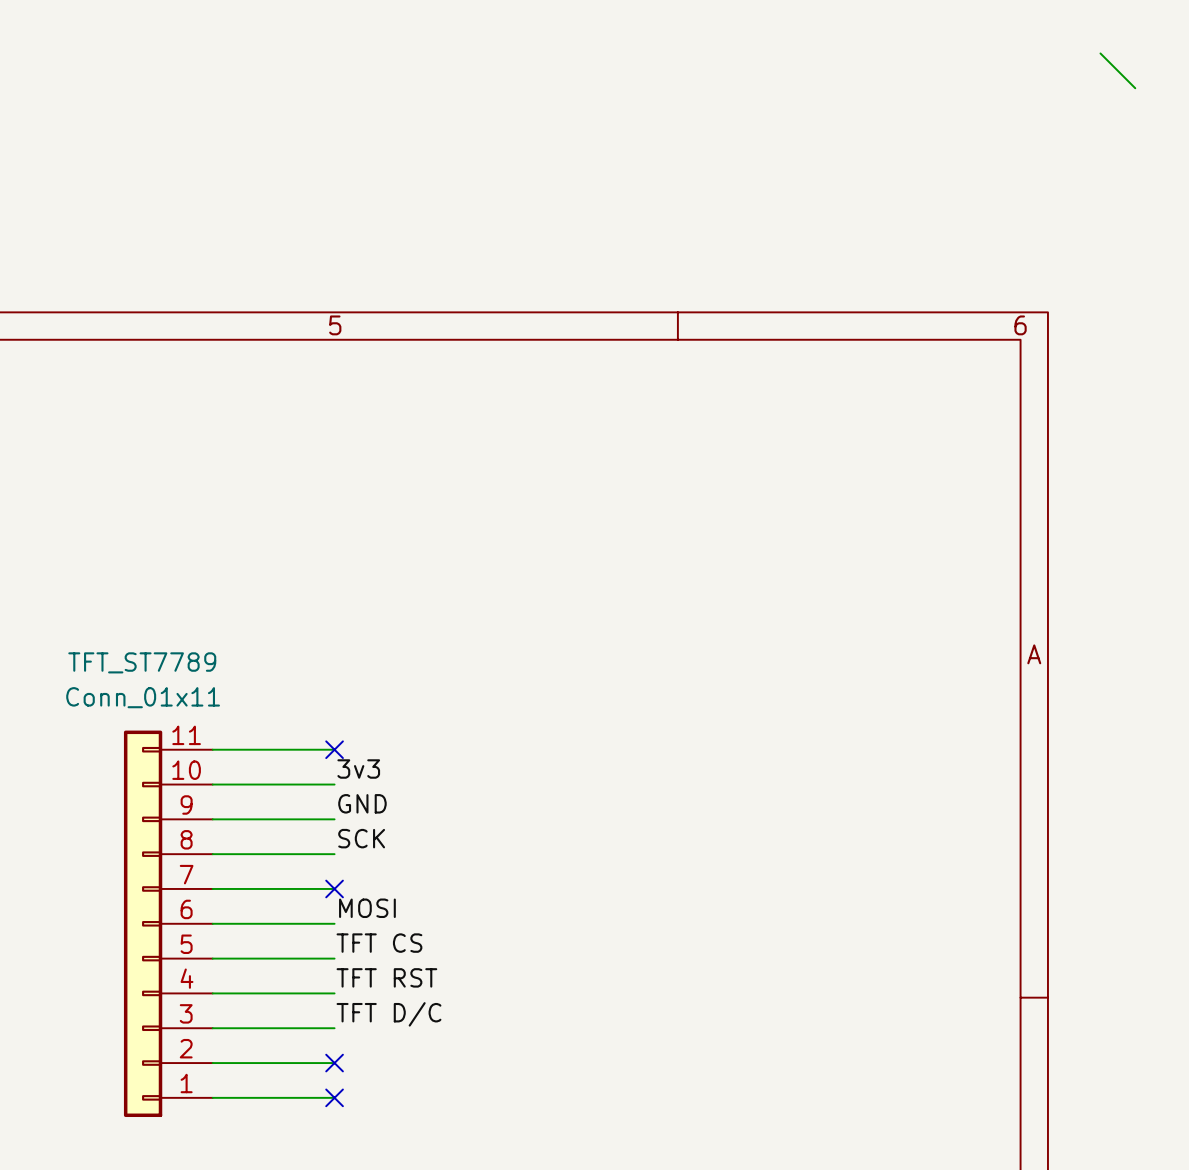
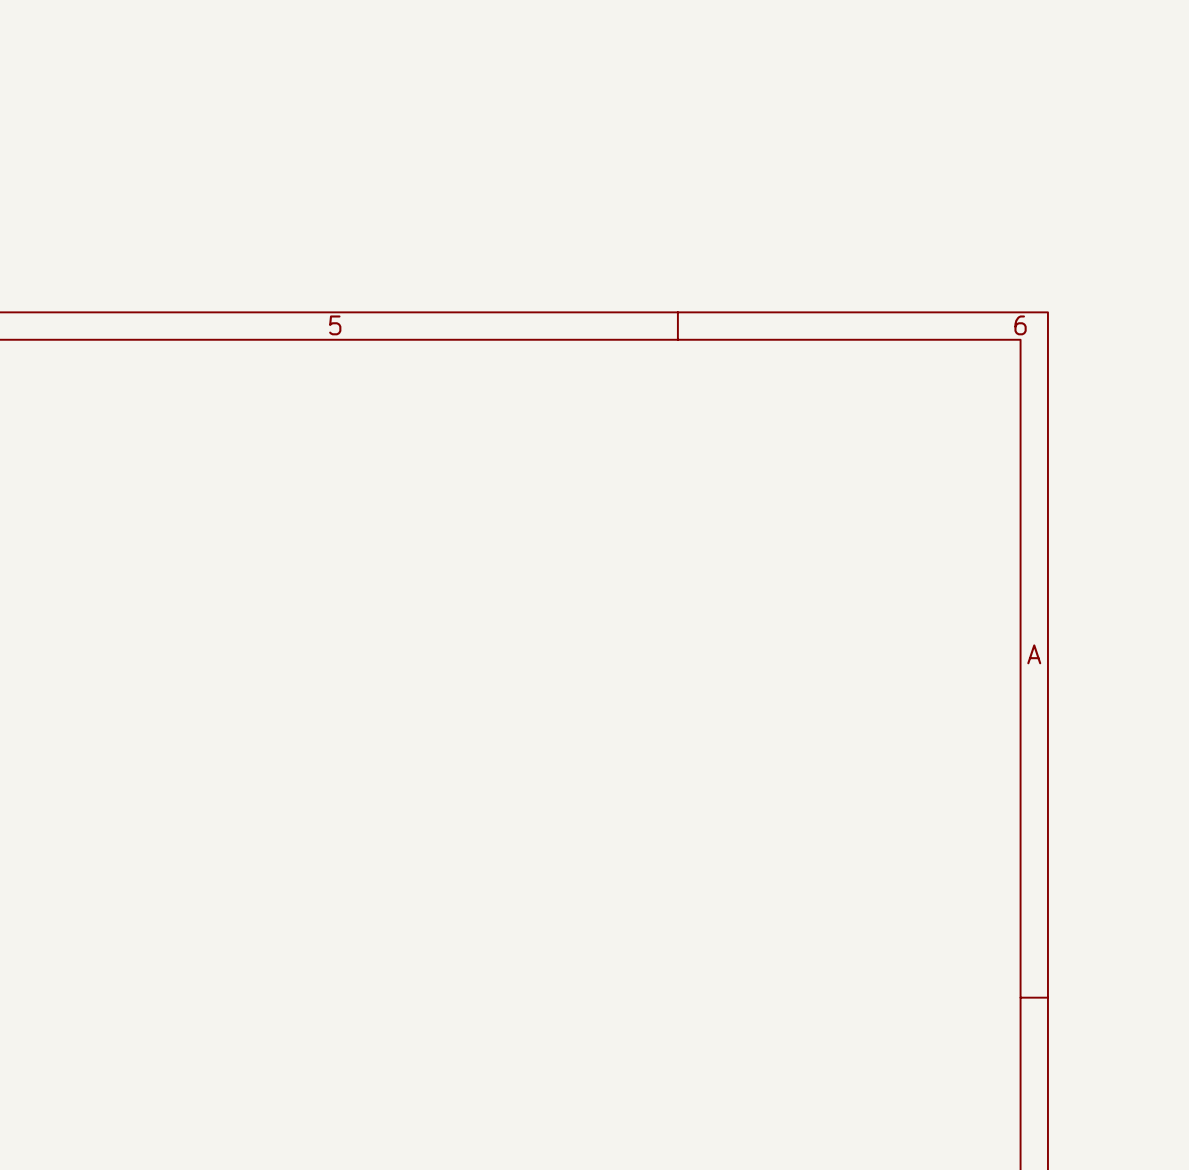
wire: (1100, 53) (1135, 88) -> none
wire: (212, 749) (334, 749) -> none
no-connect mark: (334, 749) -> none
label: 3v3 (358, 769) -> none
wire: (212, 784) (334, 784) -> none
label: GND (362, 803) -> none
wire: (212, 819) (334, 819) -> none
label: SCK (361, 838) -> none
wire: (212, 854) (334, 854) -> none
wire: (212, 888) (334, 888) -> none
no-connect mark: (334, 888) -> none
label: MOSI (367, 908) -> none
TFT_ST7789: Conn_01x11 (168, 923) -> none
wire: (212, 923) (334, 923) -> none
label: TFT CS (379, 943) -> none
wire: (212, 958) (334, 958) -> none
label: TFT RST (386, 977) -> none
wire: (212, 993) (334, 993) -> none
label: TFT D/C (388, 1014) -> none
wire: (212, 1028) (334, 1028) -> none
wire: (212, 1063) (334, 1063) -> none
no-connect mark: (334, 1063) -> none
wire: (212, 1097) (334, 1097) -> none
no-connect mark: (334, 1097) -> none

